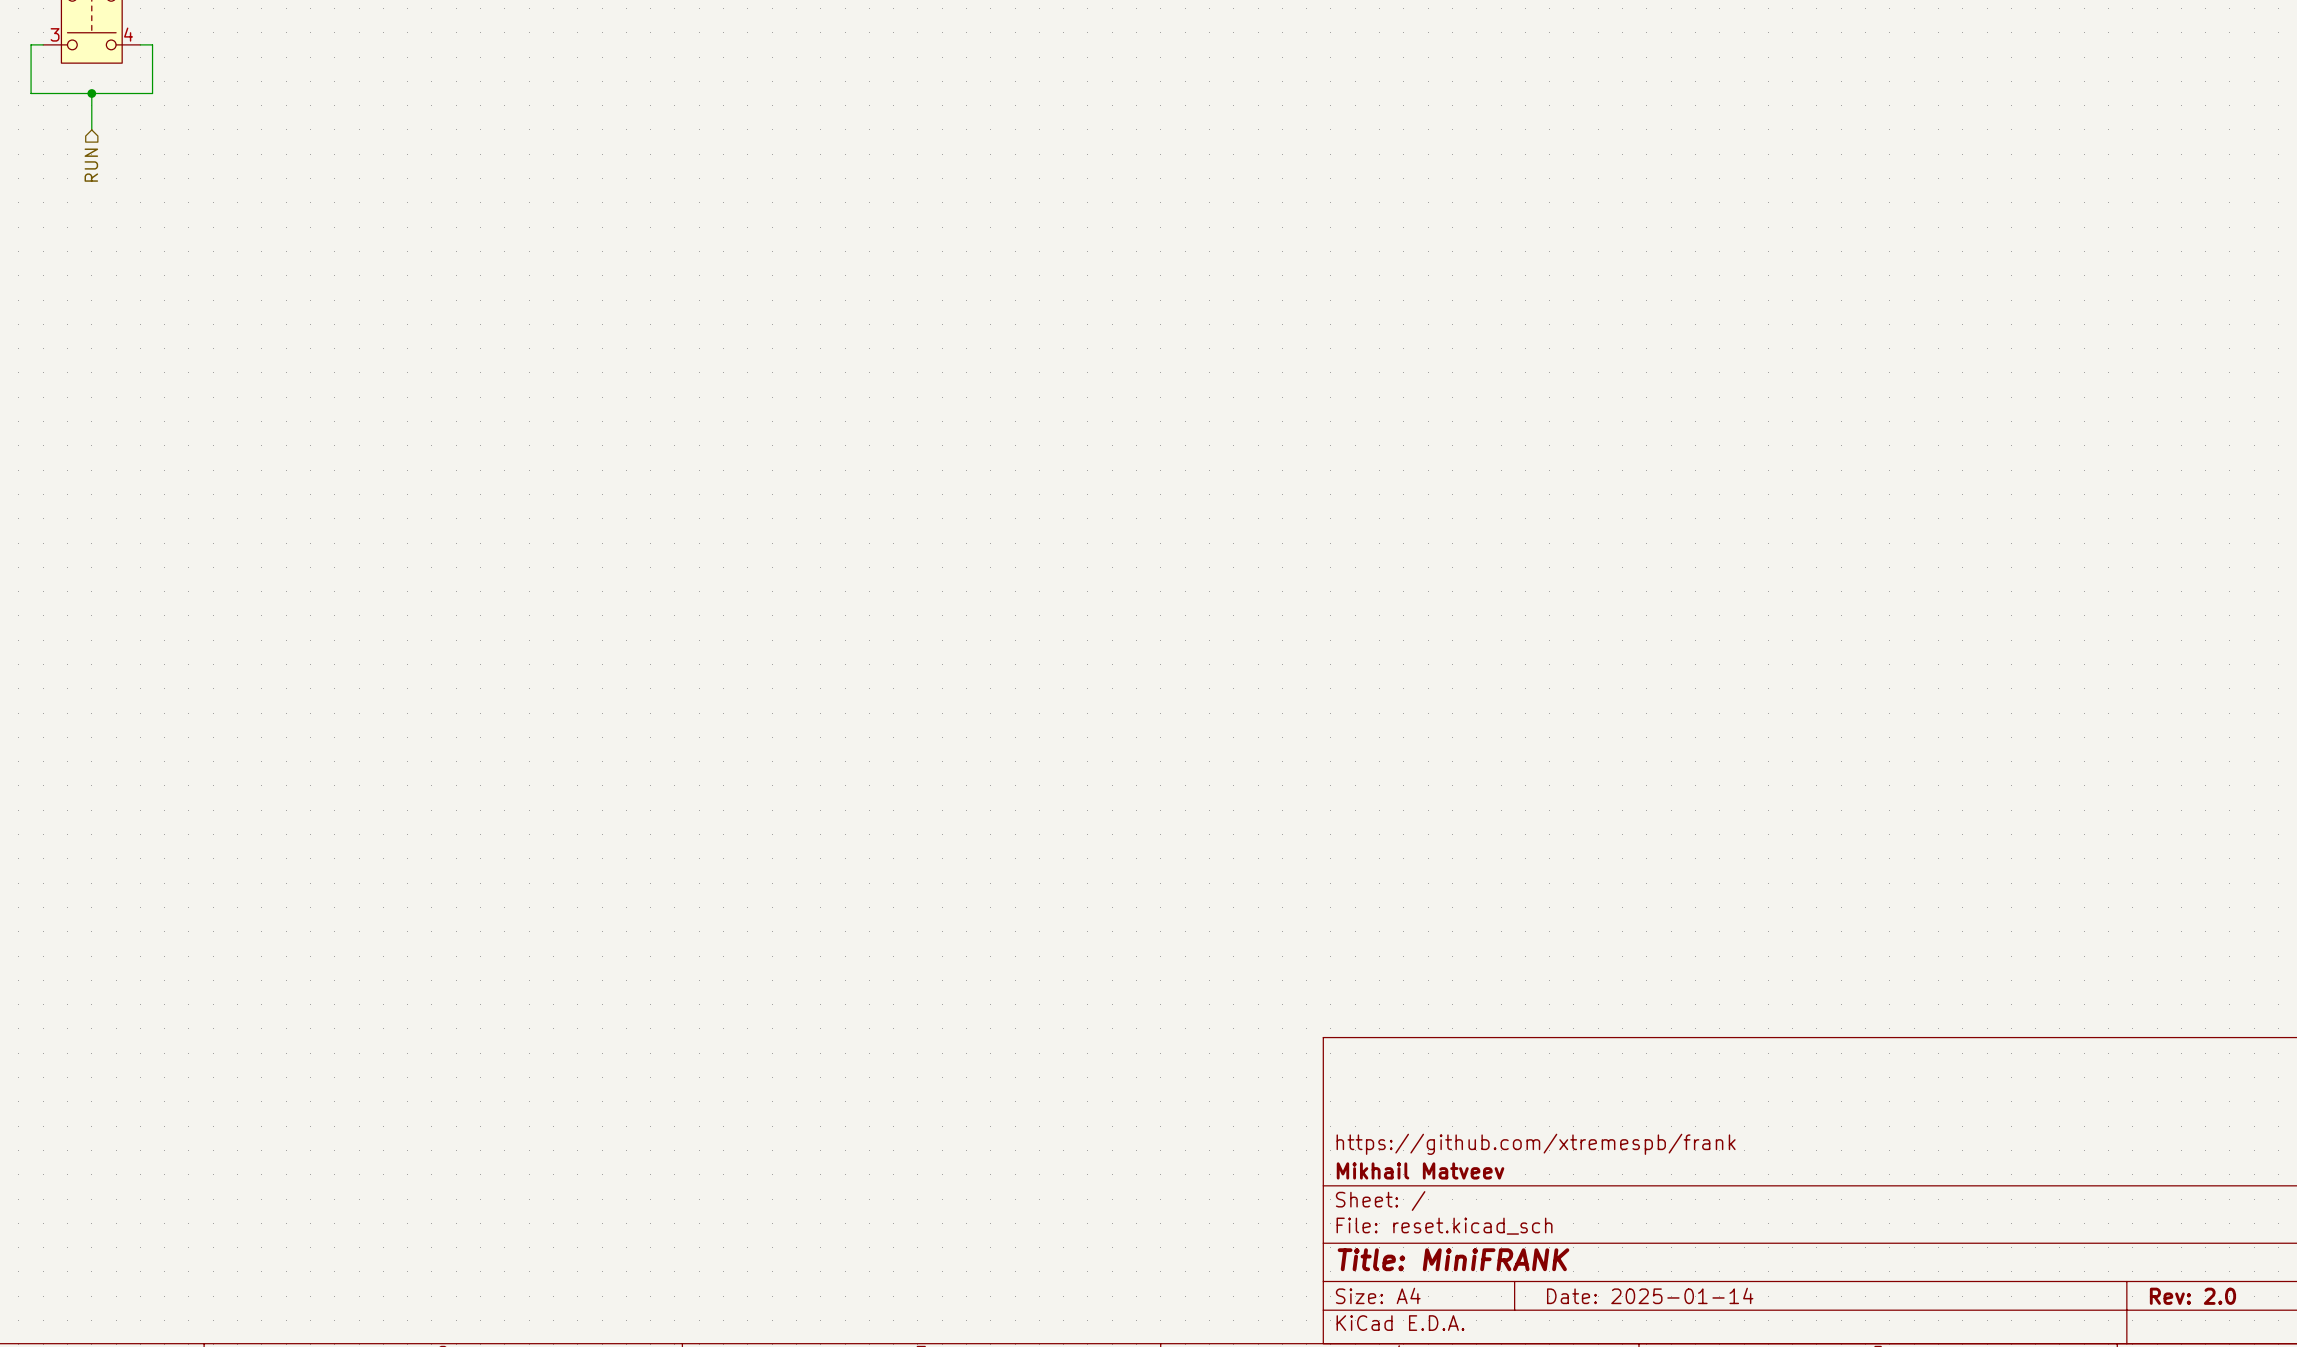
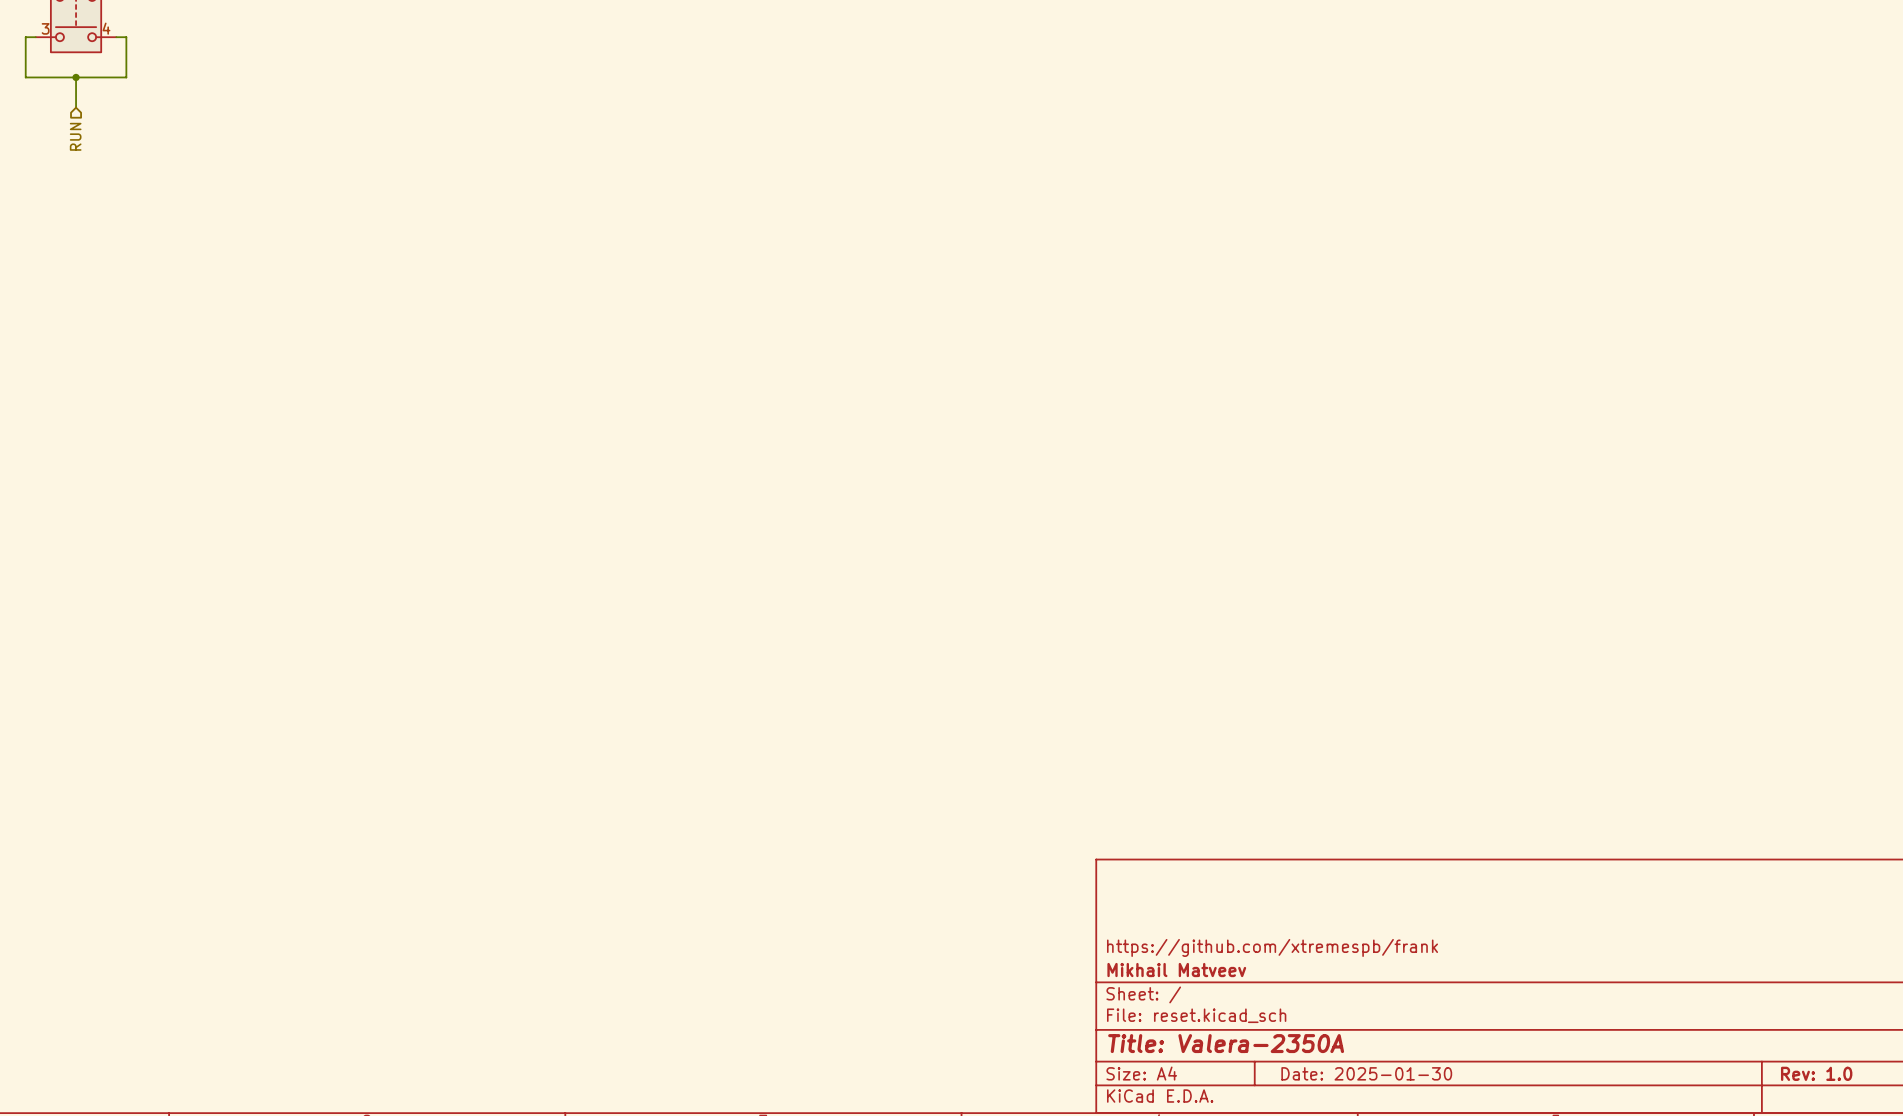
title block: Title: MiniFRANK (1453, 1259) -> Title: Valera-2350A (1226, 1043)
title block: Date: 2025-01-14 (1650, 1295) -> Date: 2025-01-30 (1366, 1073)
title block: Rev: 2.0 (2192, 1296) -> Rev: 1.0 (1816, 1073)

